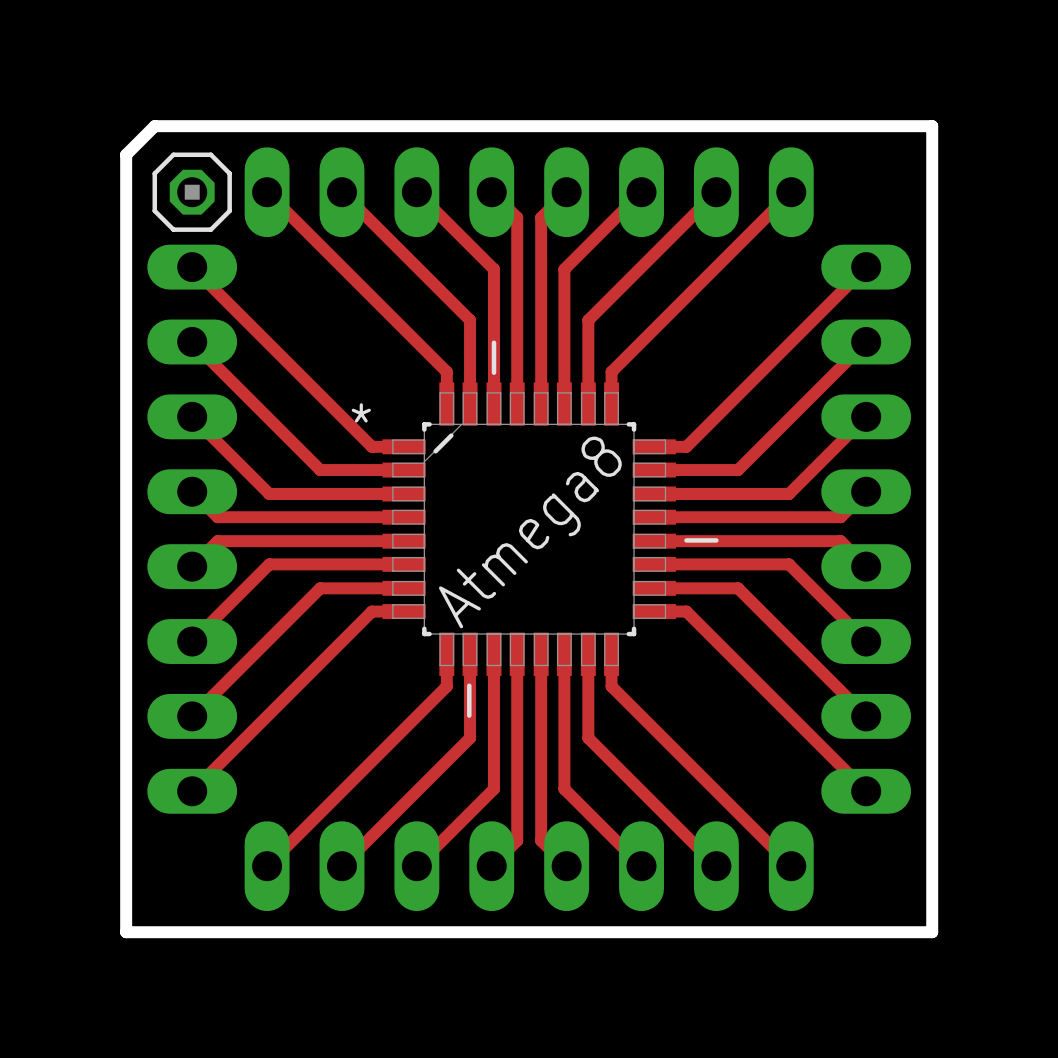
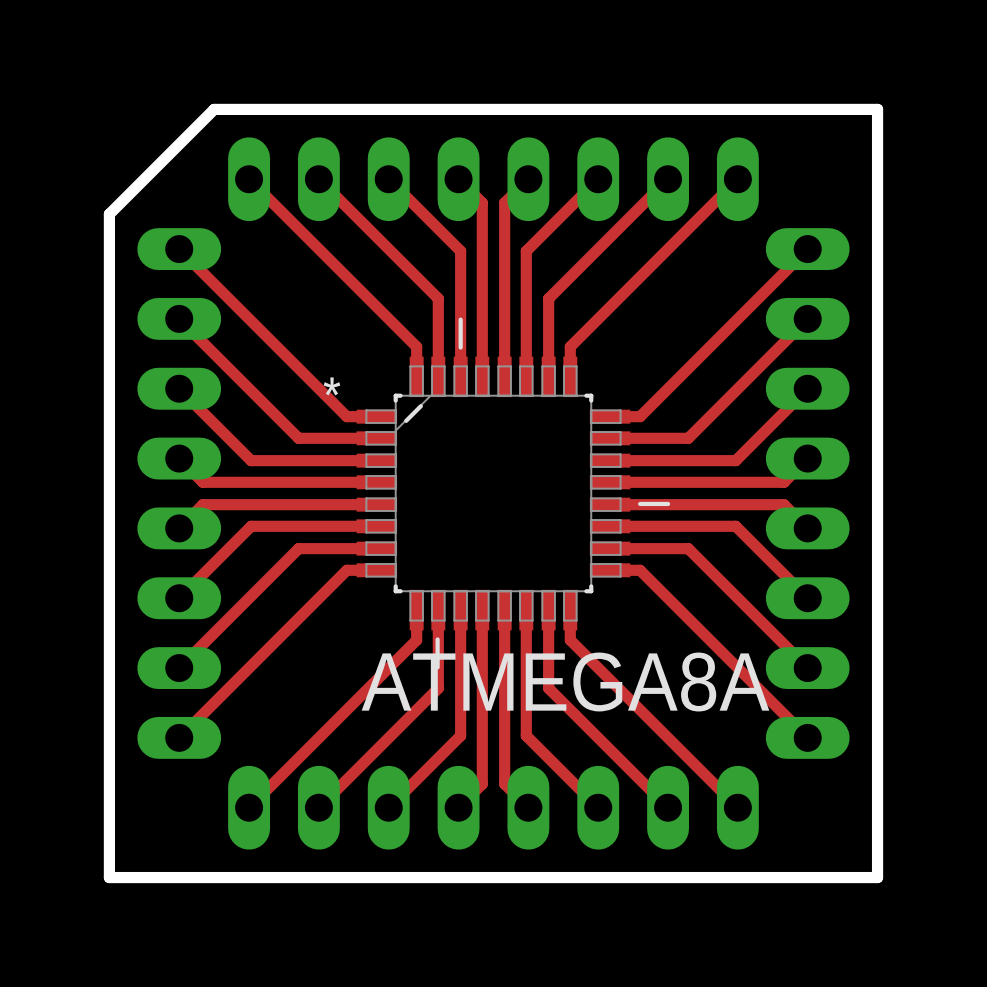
board edge: (154, 126) (932, 126) (932, 932) (126, 932) (126, 154) (154, 126) -> (214, 109) (109, 214) (109, 877) (877, 877) (877, 109) (214, 109)
part: (192, 192) -> none
text: Atmega8 (530, 532) -> none
ATMEGA8A name: none -> ATMEGA8A (565, 682)

